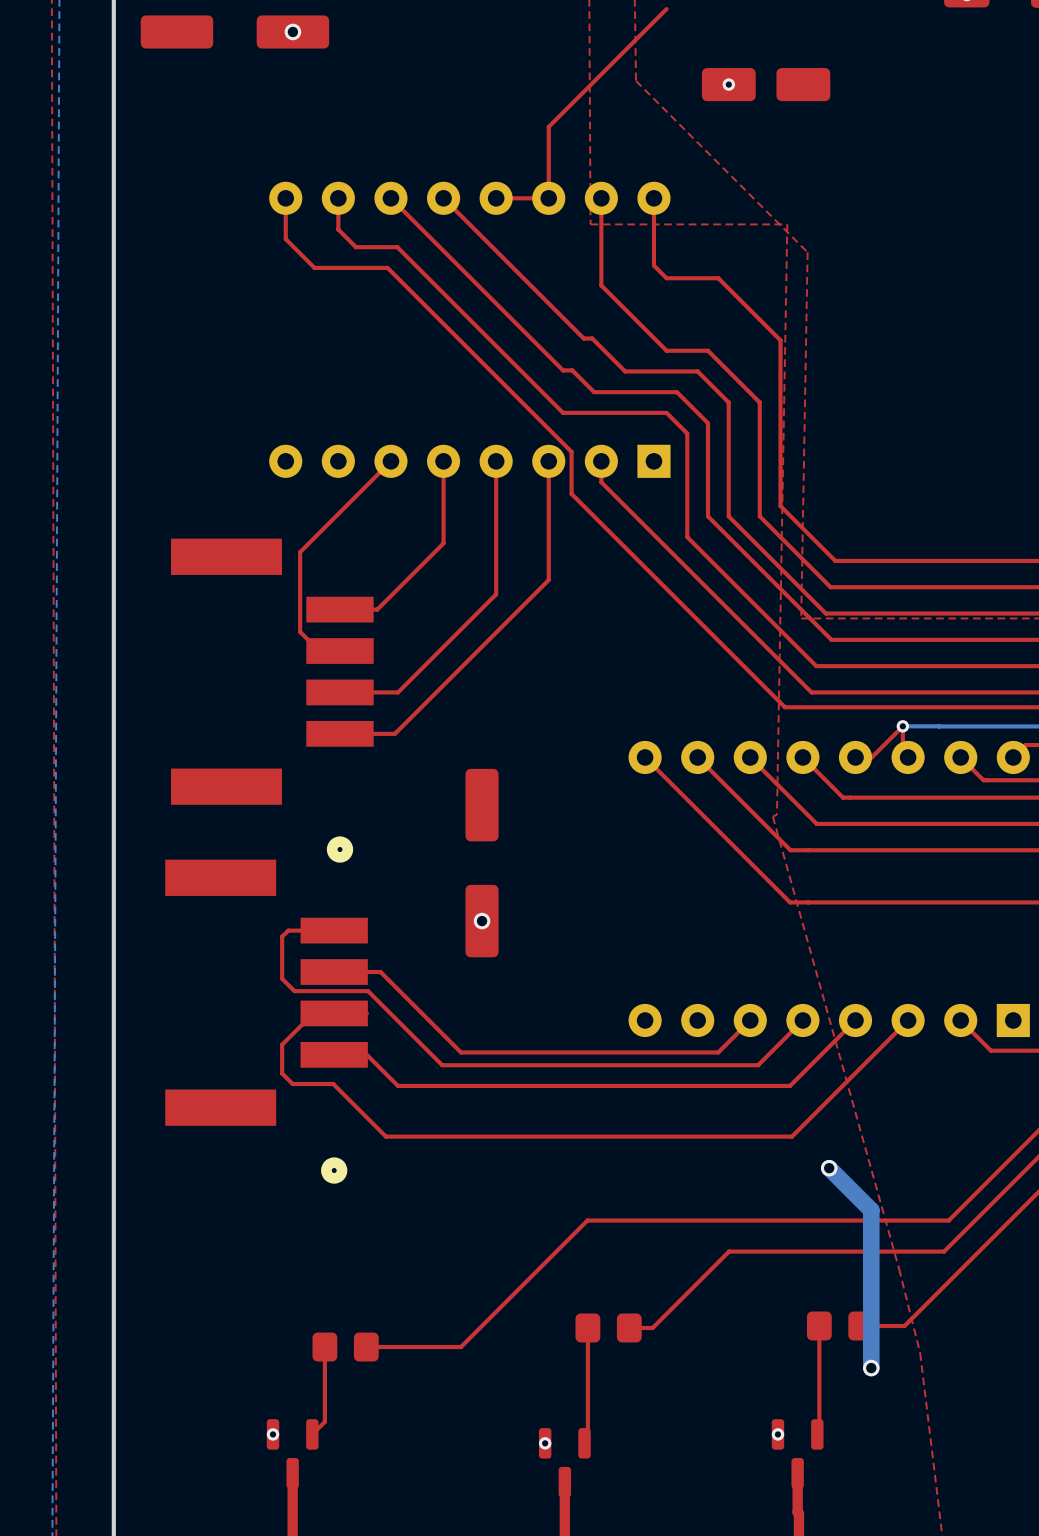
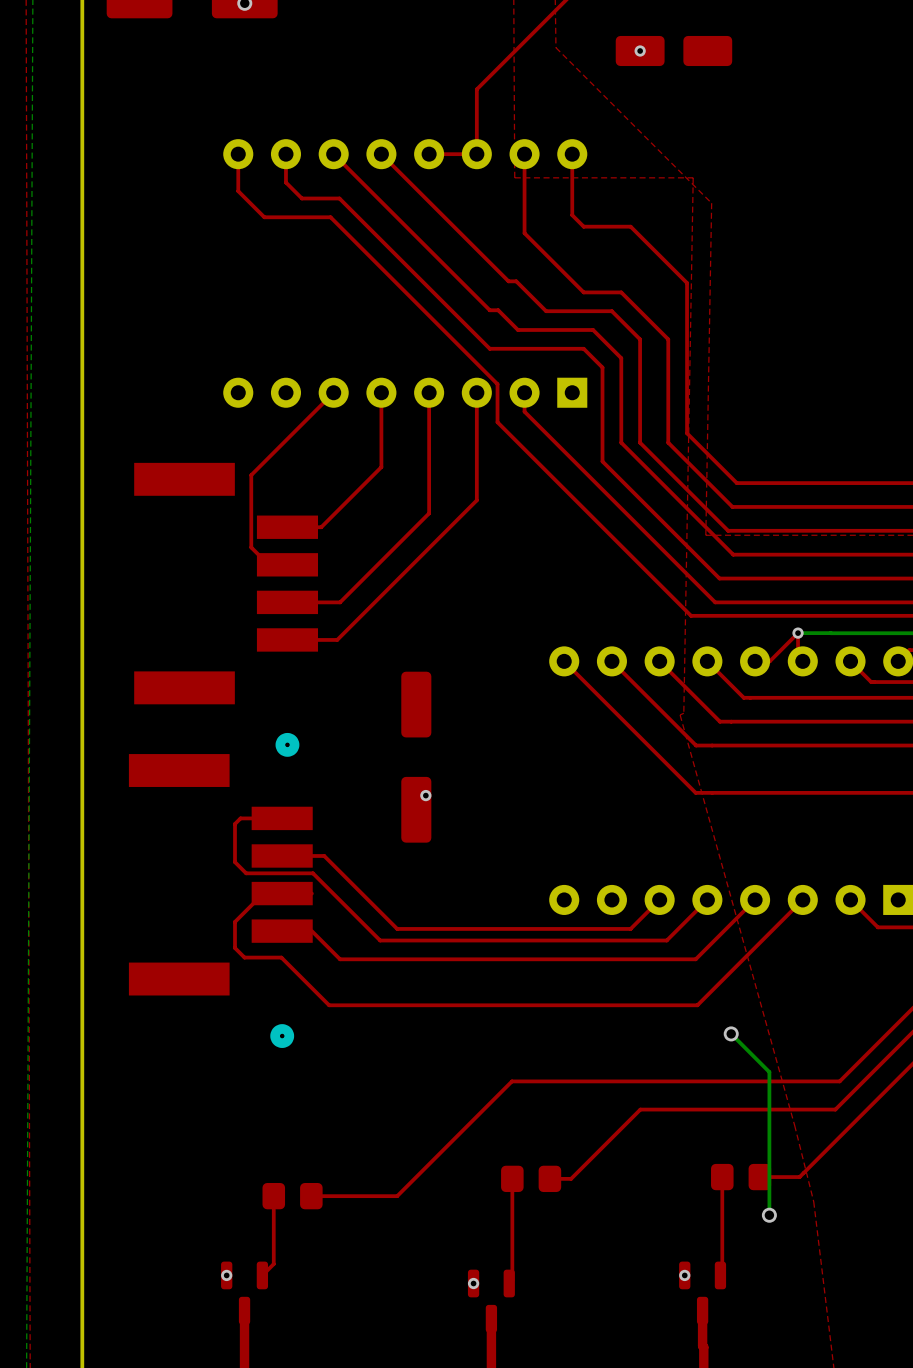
via: none -> (425, 795)
via: (482, 921) -> none
bottom track width: thick (829, 1168) (871, 1210) (871, 1368) -> thin (731, 1033) (769, 1072) (769, 1215)

